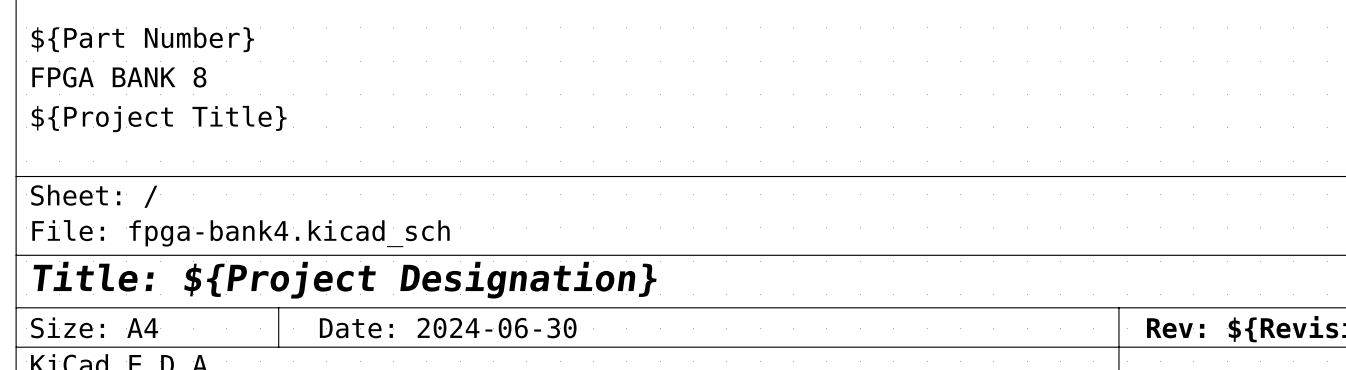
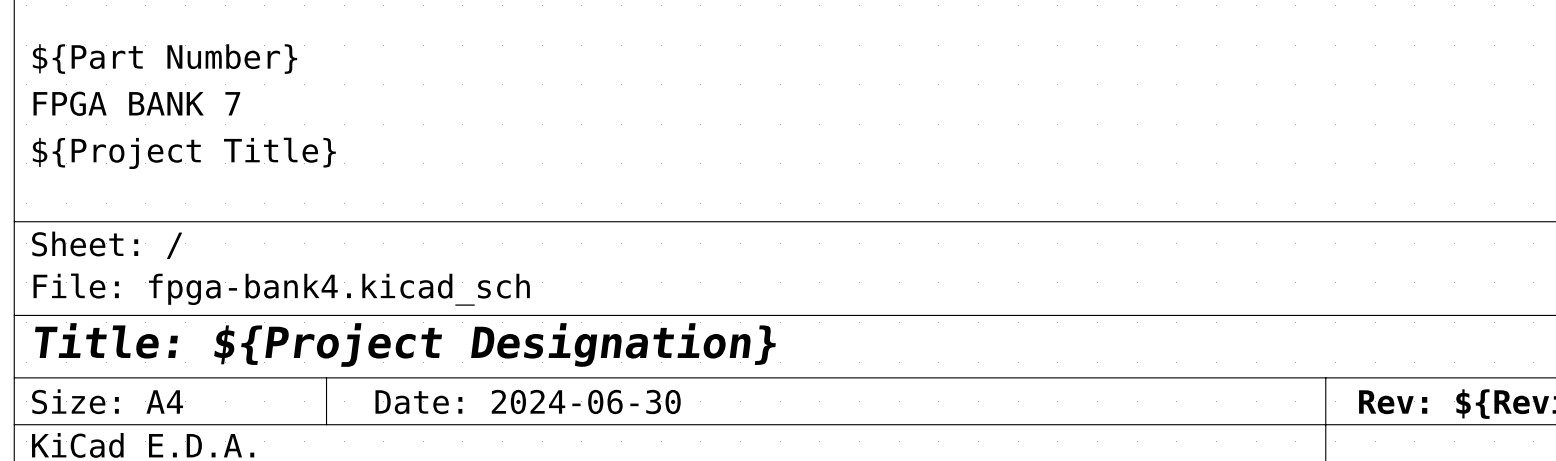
title block: FPGA BANK 8 (119, 77) -> FPGA BANK 7 (136, 103)

